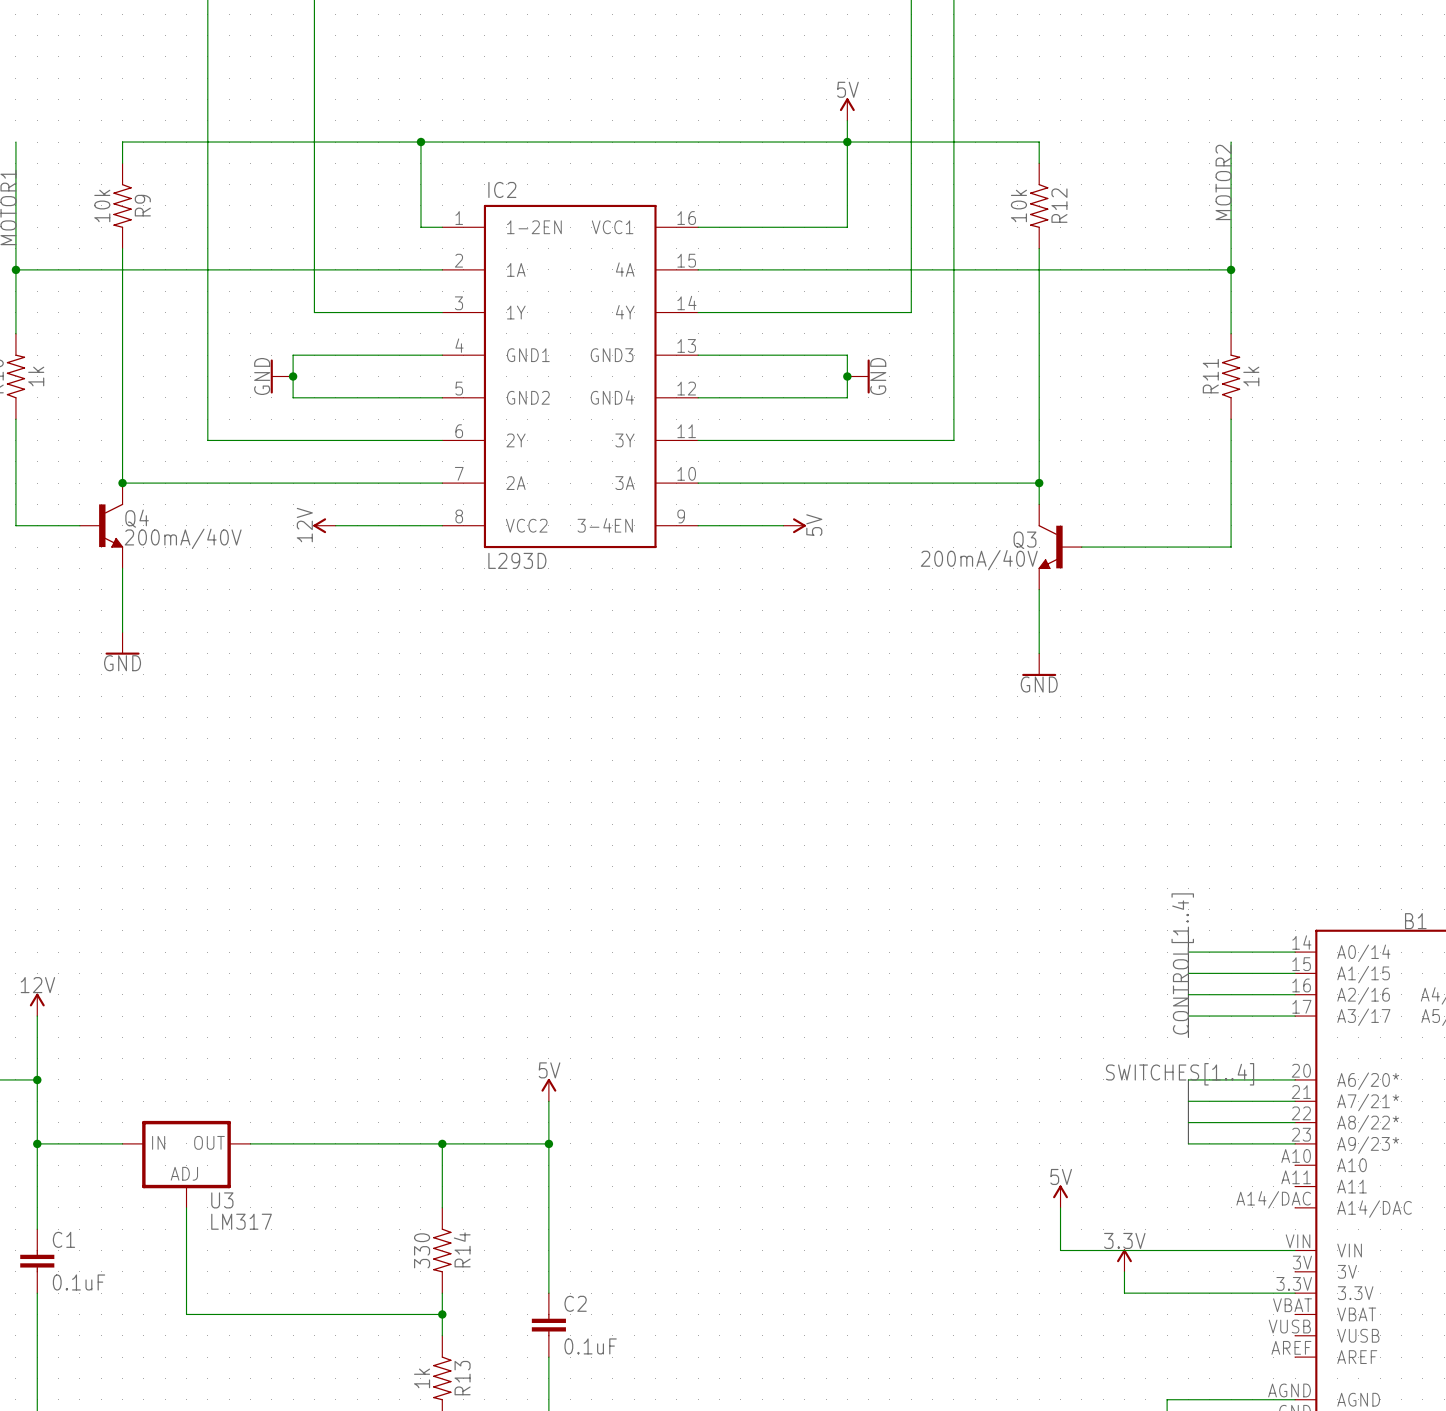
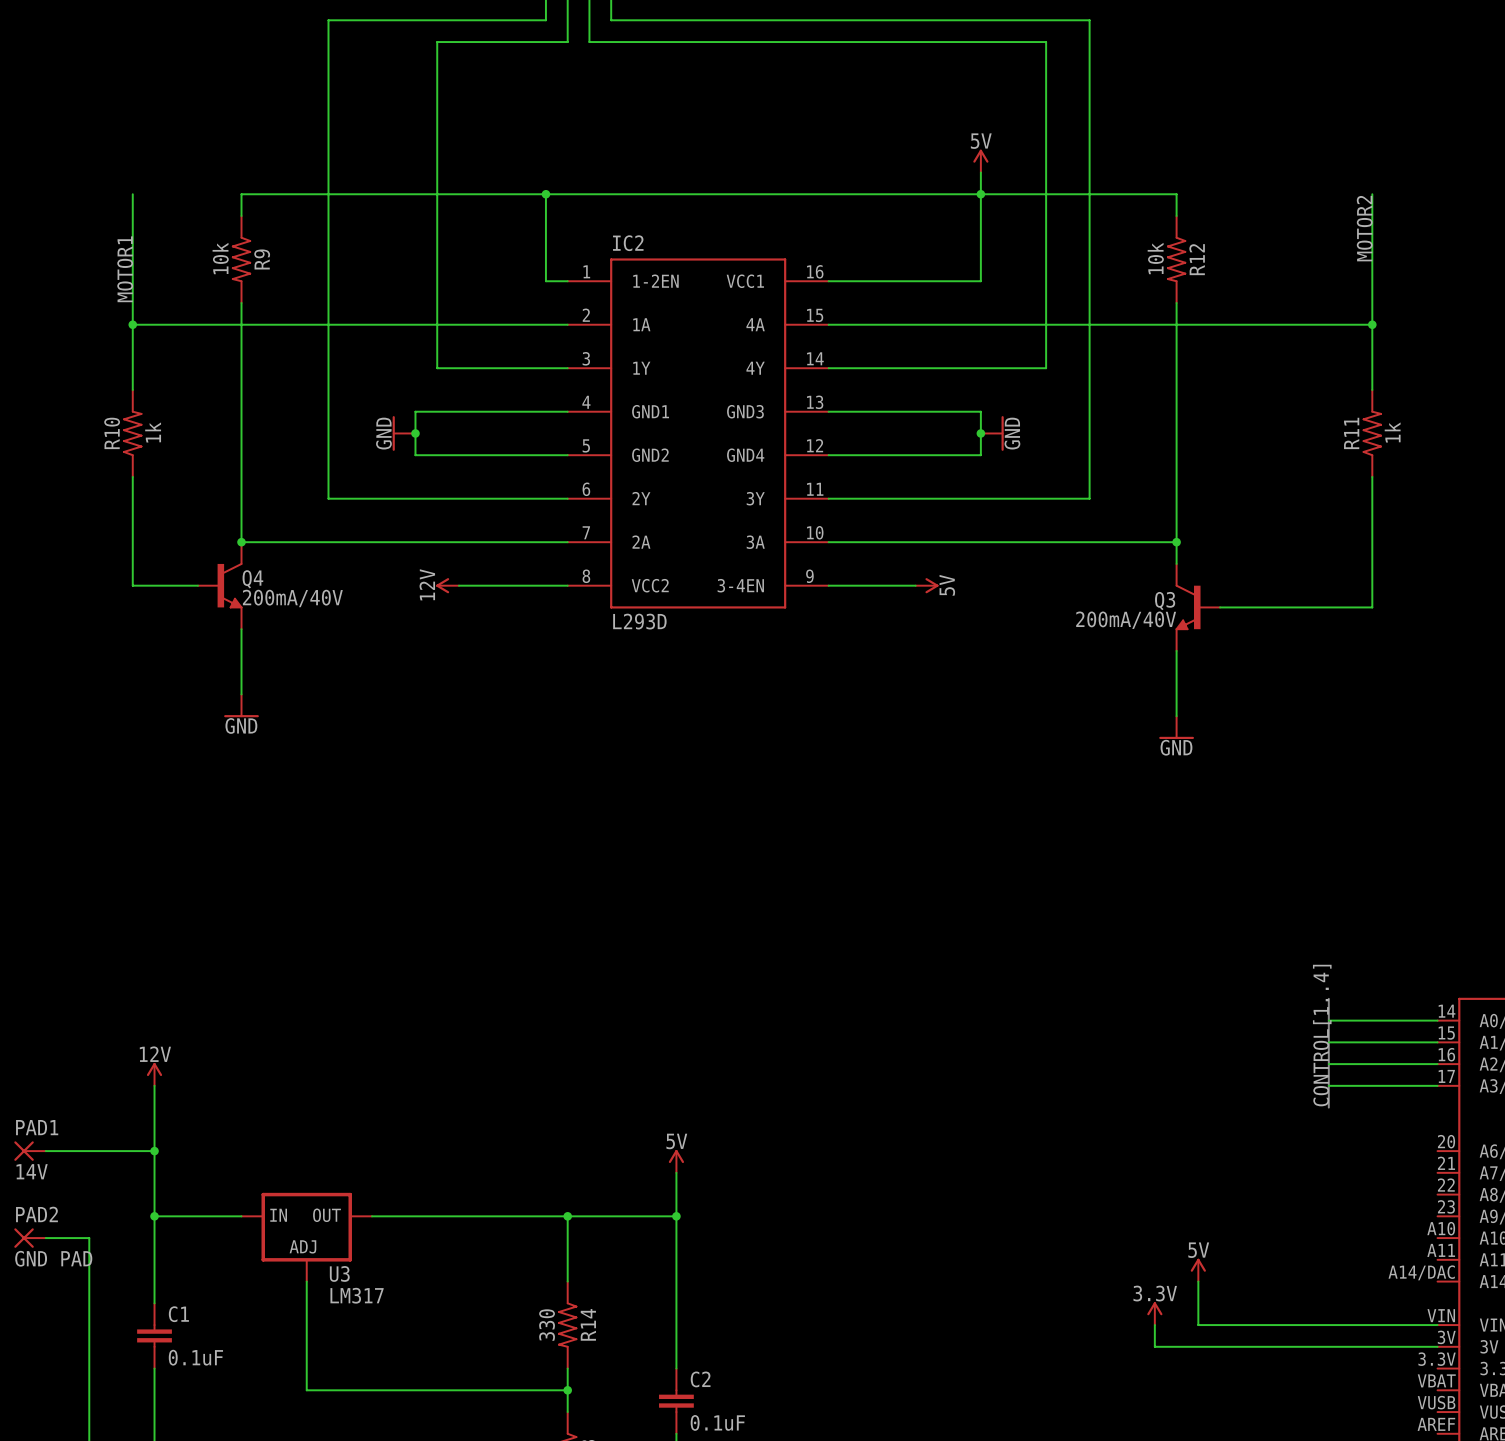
label: SWITCHES[1..4] (1180, 1074) -> none
bus: (1188, 1079) (1188, 1143) -> none
wire: (1188, 1079) (1295, 1079) -> none
wire: (1188, 1101) (1295, 1101) -> none
wire: (1188, 1122) (1295, 1122) -> none
wire: (1188, 1143) (1295, 1143) -> none
wire: none -> (1154, 1325) (1154, 1346) (1437, 1346)
power symbol position: 3.3V (1124, 1260) -> 3.3V (1154, 1313)
wire: (1124, 1271) (1124, 1293) (1295, 1293) -> none

